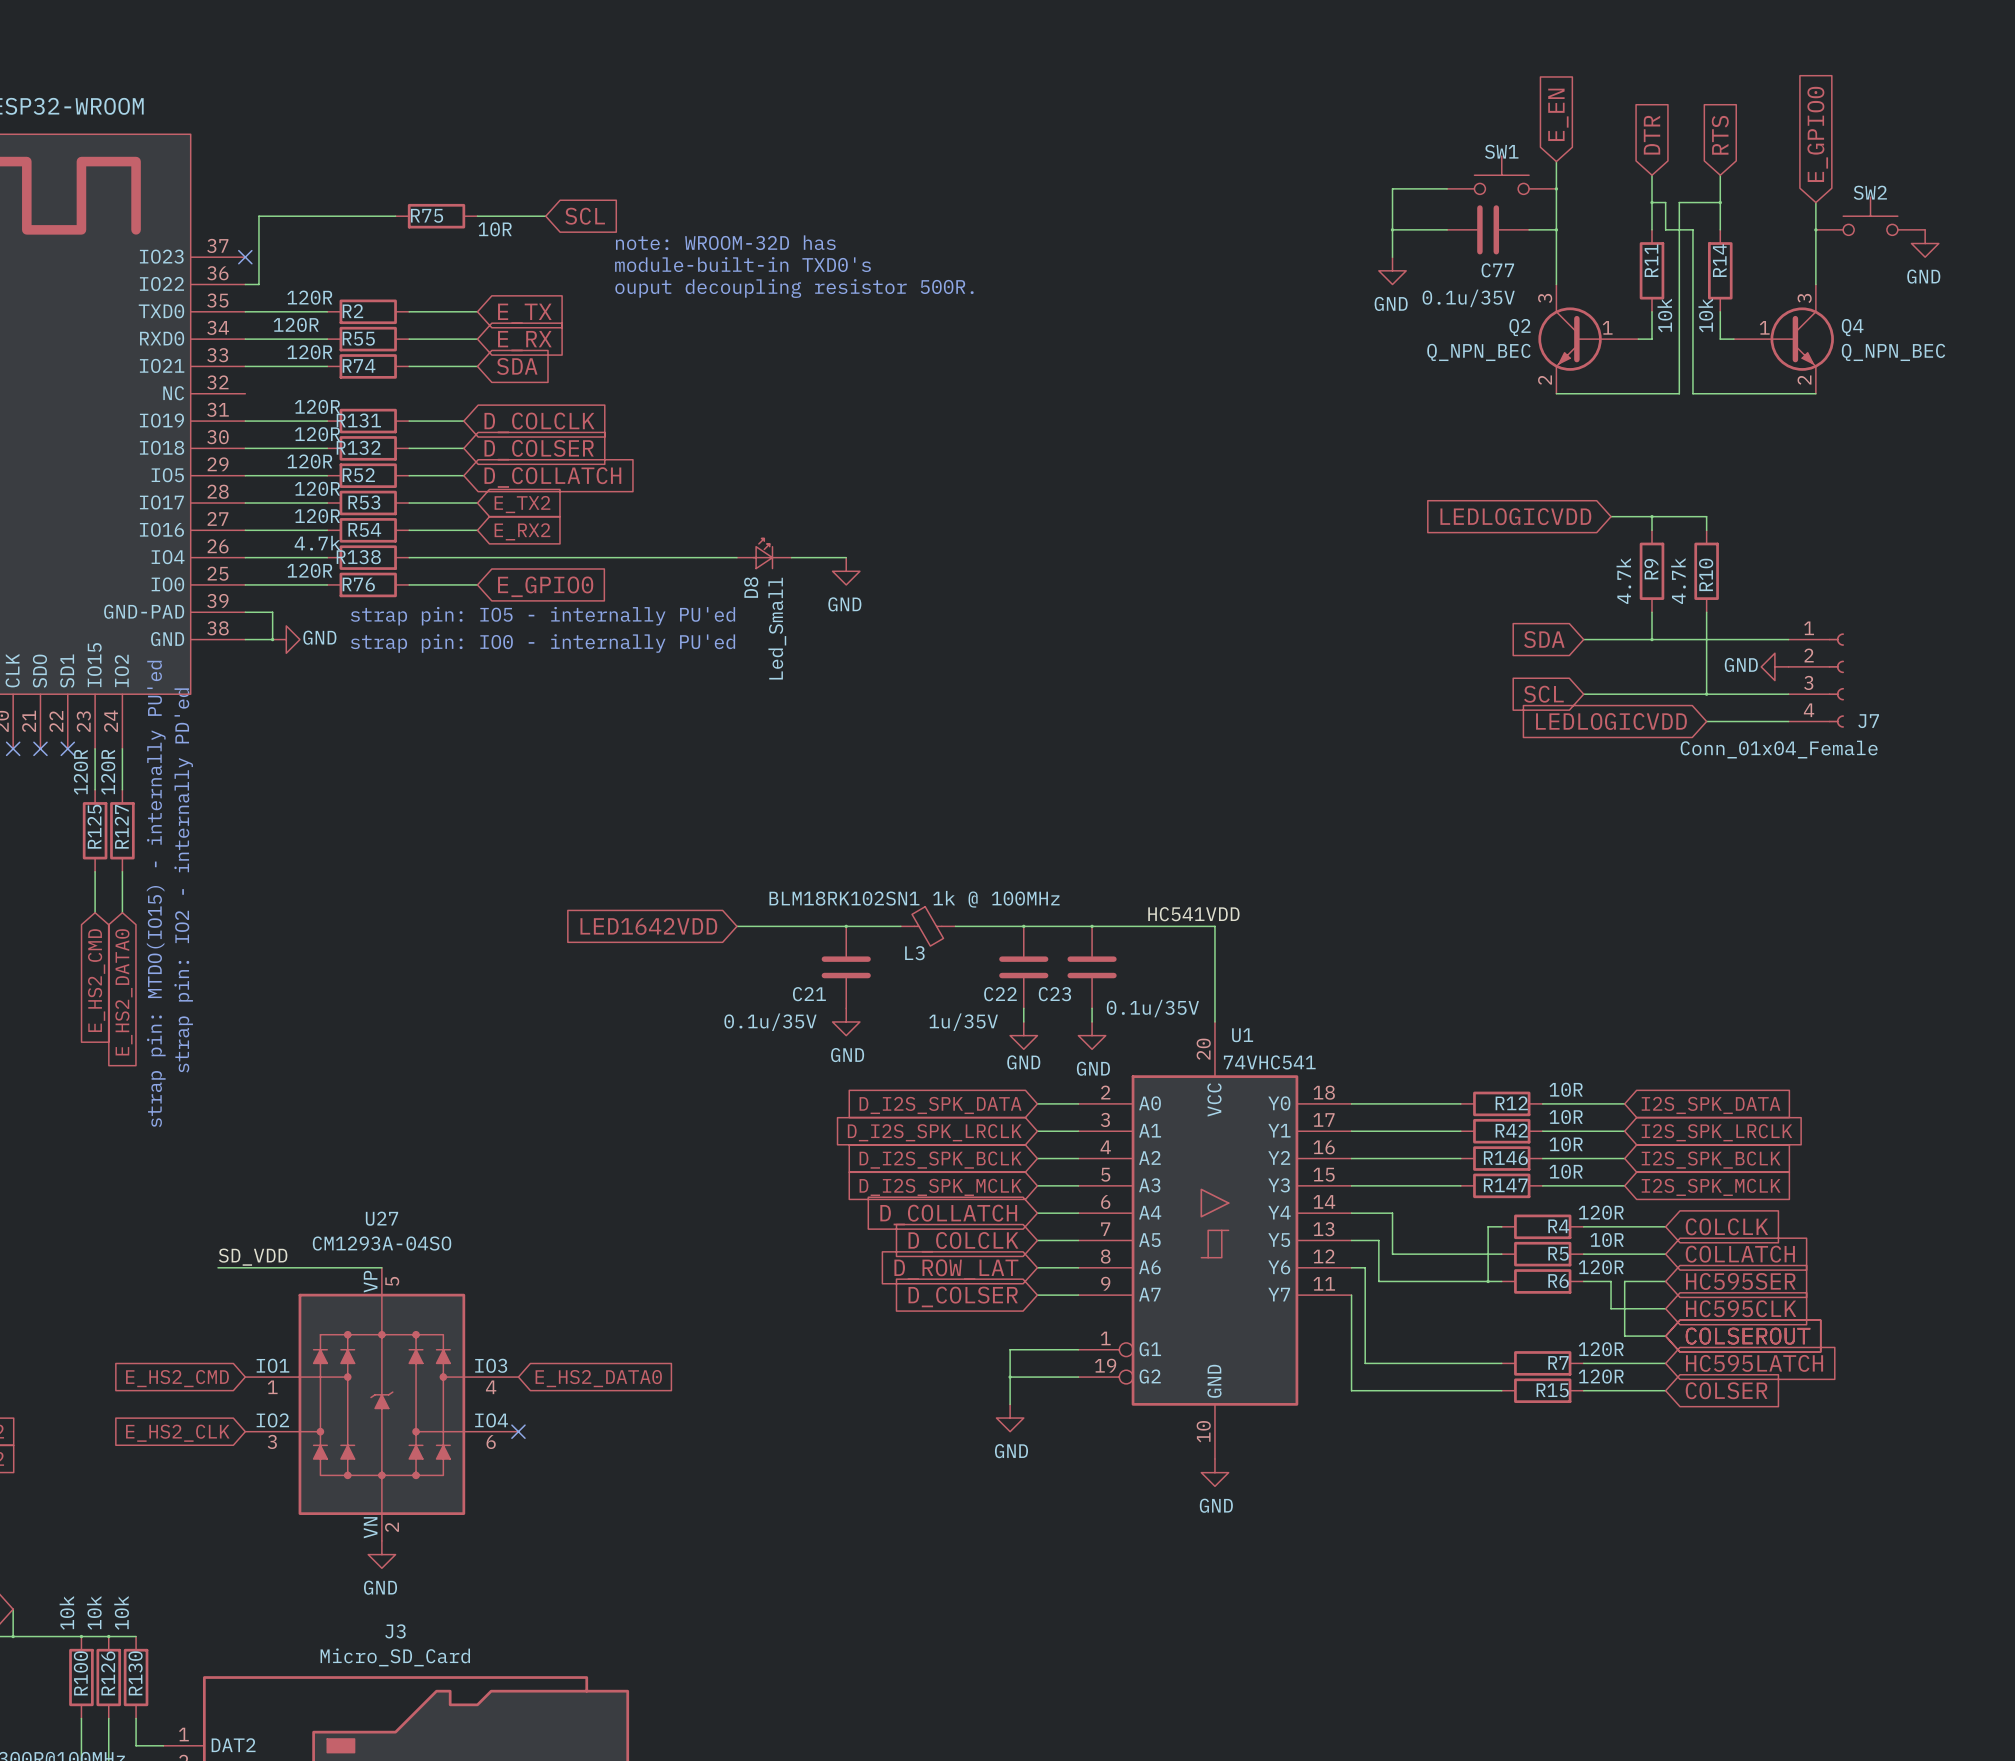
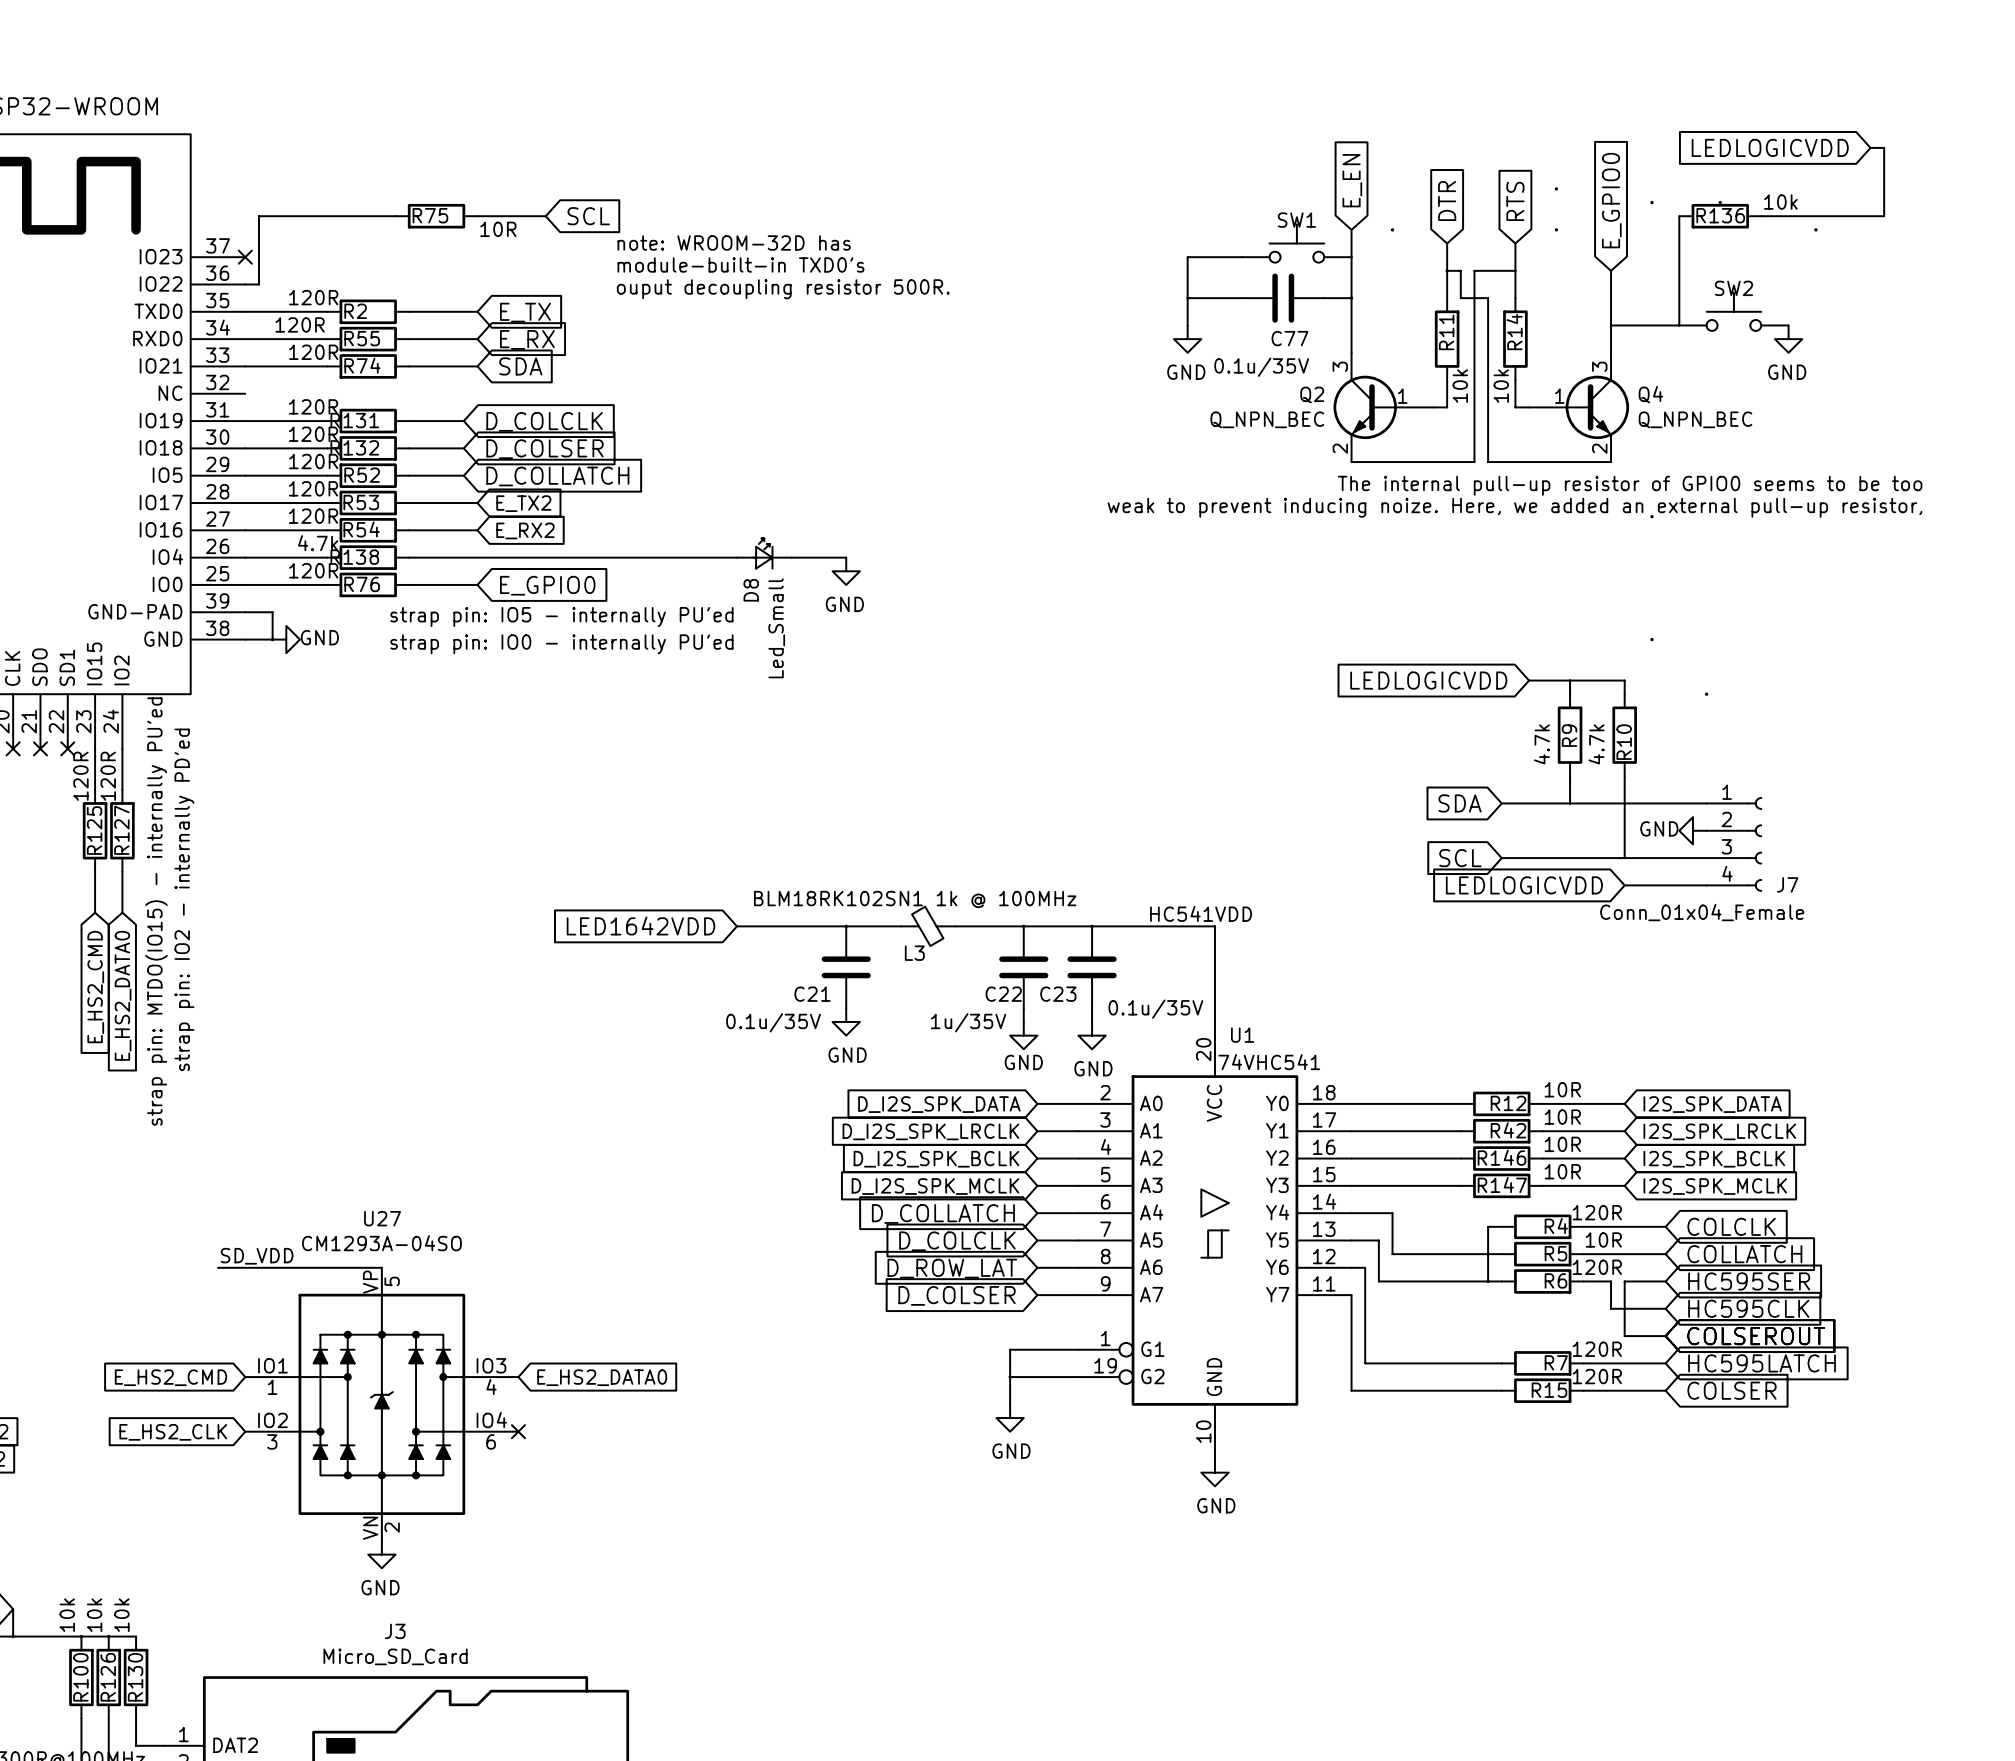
global label position: E_EN (1558, 114) -> E_EN (1352, 180)
global label position: E_GPIO0 (1817, 134) -> E_GPIO0 (1611, 200)
global label position: DTR (1652, 135) -> DTR (1447, 200)
global label position: RTS (1720, 135) -> RTS (1515, 201)
global label: none -> LEDLOGICVDD (1770, 147)
wire: none -> (1870, 147) (1884, 147) (1884, 216) (1761, 216)
wire: (1556, 161) (1556, 284) -> (1351, 229) (1351, 352)
SW1 position: (1501, 175) -> (1296, 243)
wire: (1652, 175) (1652, 229) -> (1447, 243) (1447, 298)
wire: (1720, 175) (1720, 229) -> (1515, 243) (1515, 298)
wire: (1447, 188) (1392, 188) (1392, 257) -> (1242, 257) (1187, 257) (1187, 325)
wire: (1652, 202) (1665, 202) (1665, 229) (1692, 229) (1692, 393) (1815, 393) -> (1447, 270) (1460, 270) (1460, 298) (1488, 298) (1488, 462) (1611, 462)
wire: (1720, 202) (1679, 202) (1679, 216) -> none
wire: (1815, 202) (1815, 284) -> (1611, 270) (1611, 352)
R136: none -> 10k (1720, 216)
SW2 position: (1870, 216) -> (1733, 311)
wire: (1392, 229) (1447, 229) -> (1187, 298) (1242, 298)
C77 position: (1488, 229) -> (1283, 298)
wire: (1529, 229) (1556, 229) -> (1324, 298) (1351, 298)
power symbol: GND (1925, 243) -> none
power symbol: GND (1392, 270) -> none
wire: none -> (1515, 270) (1474, 270) (1474, 462) (1351, 462)
R11 position: (1652, 270) -> (1447, 339)
R14 position: (1720, 270) -> (1515, 339)
wire: (1652, 311) (1652, 339) (1638, 339) -> (1447, 380) (1447, 407) (1433, 407)
wire: (1720, 311) (1720, 339) (1733, 339) -> (1515, 380) (1515, 407) (1529, 407)
wire: (1679, 325) (1679, 393) (1556, 393) -> (1679, 325) (1611, 325)
power symbol: none -> GND (1187, 339)
Q2 position: (1588, 339) -> (1383, 407)
Q4 position: (1783, 339) -> (1579, 407)
power symbol: none -> GND (1788, 339)
text: none -> The internal pull-up resistor of GPIO0 seems to be too (1630, 485)
text: none -> weak to prevent inducing noize. Here, we added an external pull-up resistor, (1515, 507)
global label: LEDLOGICVDD (1515, 516) -> none
wire: (1611, 516) (1706, 516) (1706, 530) -> (1529, 680) (1624, 680) (1624, 694)
wire: (1652, 516) (1652, 530) -> (1570, 680) (1570, 694)
R9 position: (1652, 571) -> (1570, 735)
R10 position: (1706, 571) -> (1624, 735)
wire: (1652, 612) (1652, 639) -> (1570, 776) (1570, 803)
wire: (1706, 612) (1706, 694) -> (1624, 776) (1624, 858)
global label position: SDA (1544, 639) -> SDA (1460, 803)
wire: (1583, 639) (1788, 639) -> (1501, 803) (1706, 803)
power symbol: GND (1774, 666) -> none
global label: none -> LEDLOGICVDD (1428, 680)
J7 position: (1816, 680) -> (1734, 844)
global label position: SCL (1543, 694) -> SCL (1460, 858)
wire: (1583, 694) (1788, 694) -> (1501, 858) (1706, 858)
global label: LEDLOGICVDD (1611, 721) -> none
wire: (1706, 721) (1788, 721) -> (1624, 885) (1706, 885)
power symbol: none -> GND (1692, 830)
global label: none -> LEDLOGICVDD (1524, 885)

